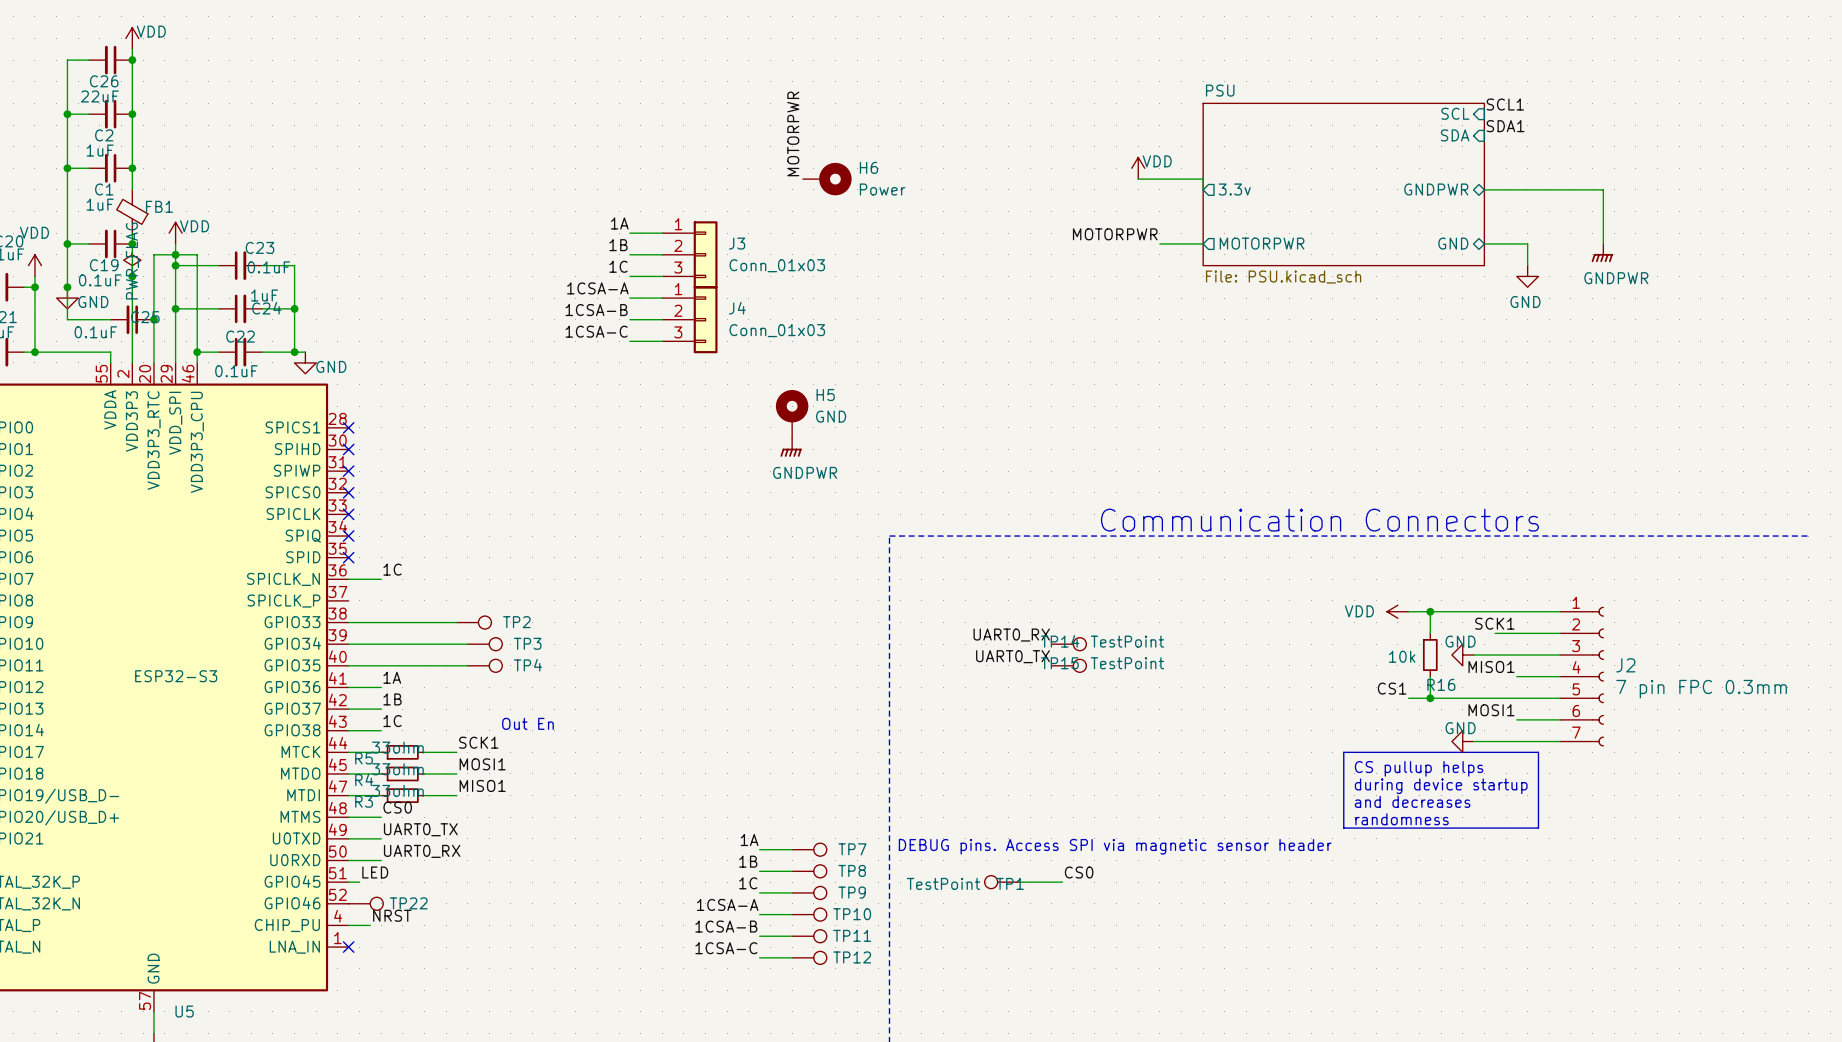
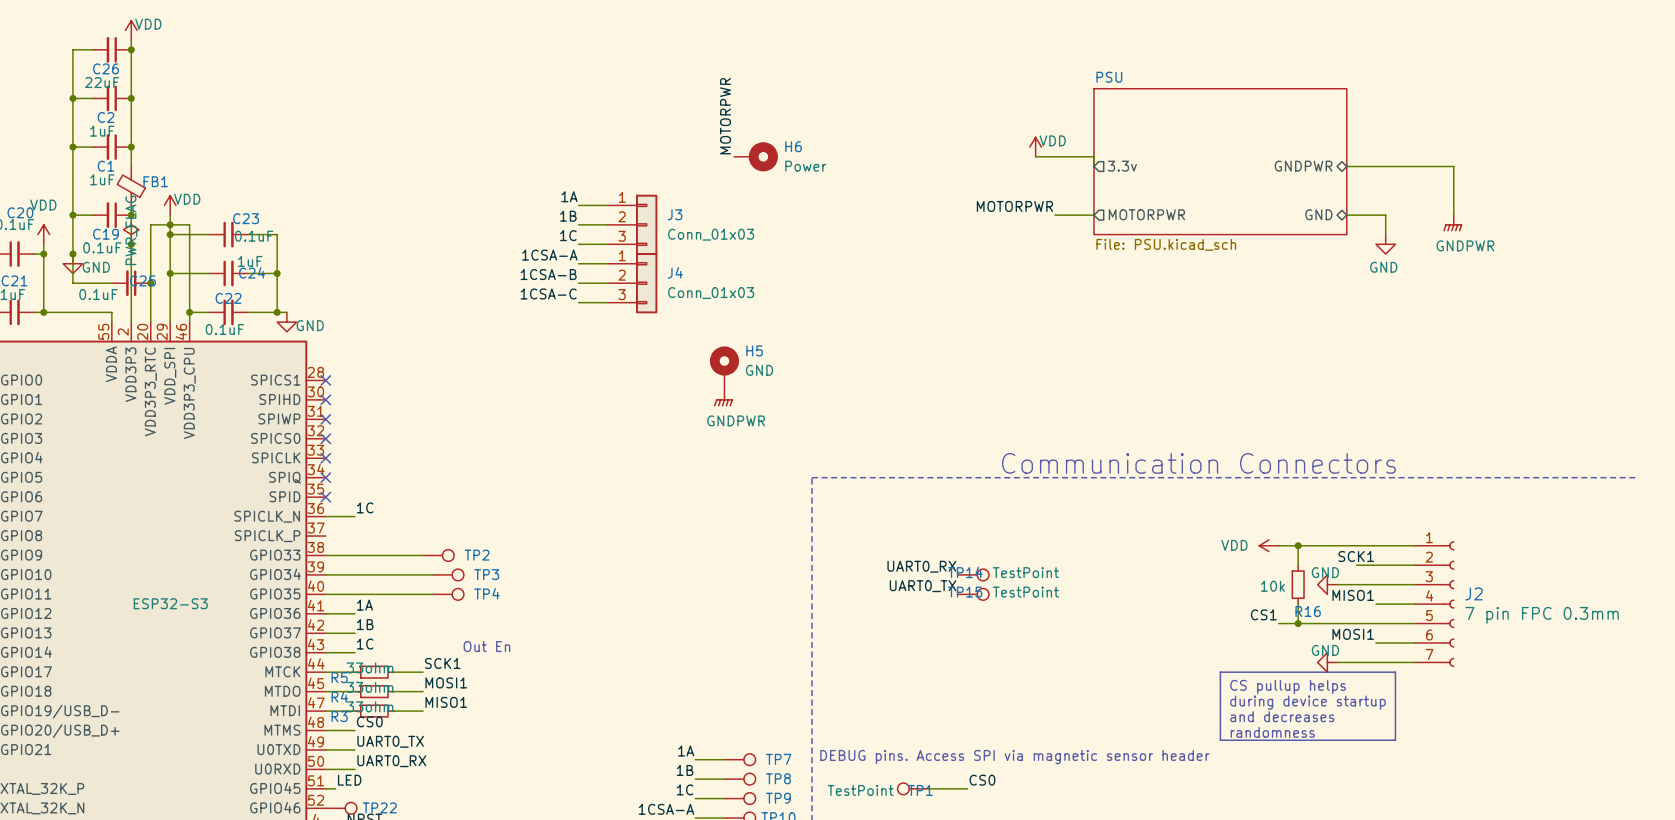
label: SCL1 (1505, 104) -> none
sheet pin: SCL (1455, 113) -> none
label: SDA1 (1505, 126) -> none
sheet pin: SDA (1455, 135) -> none

